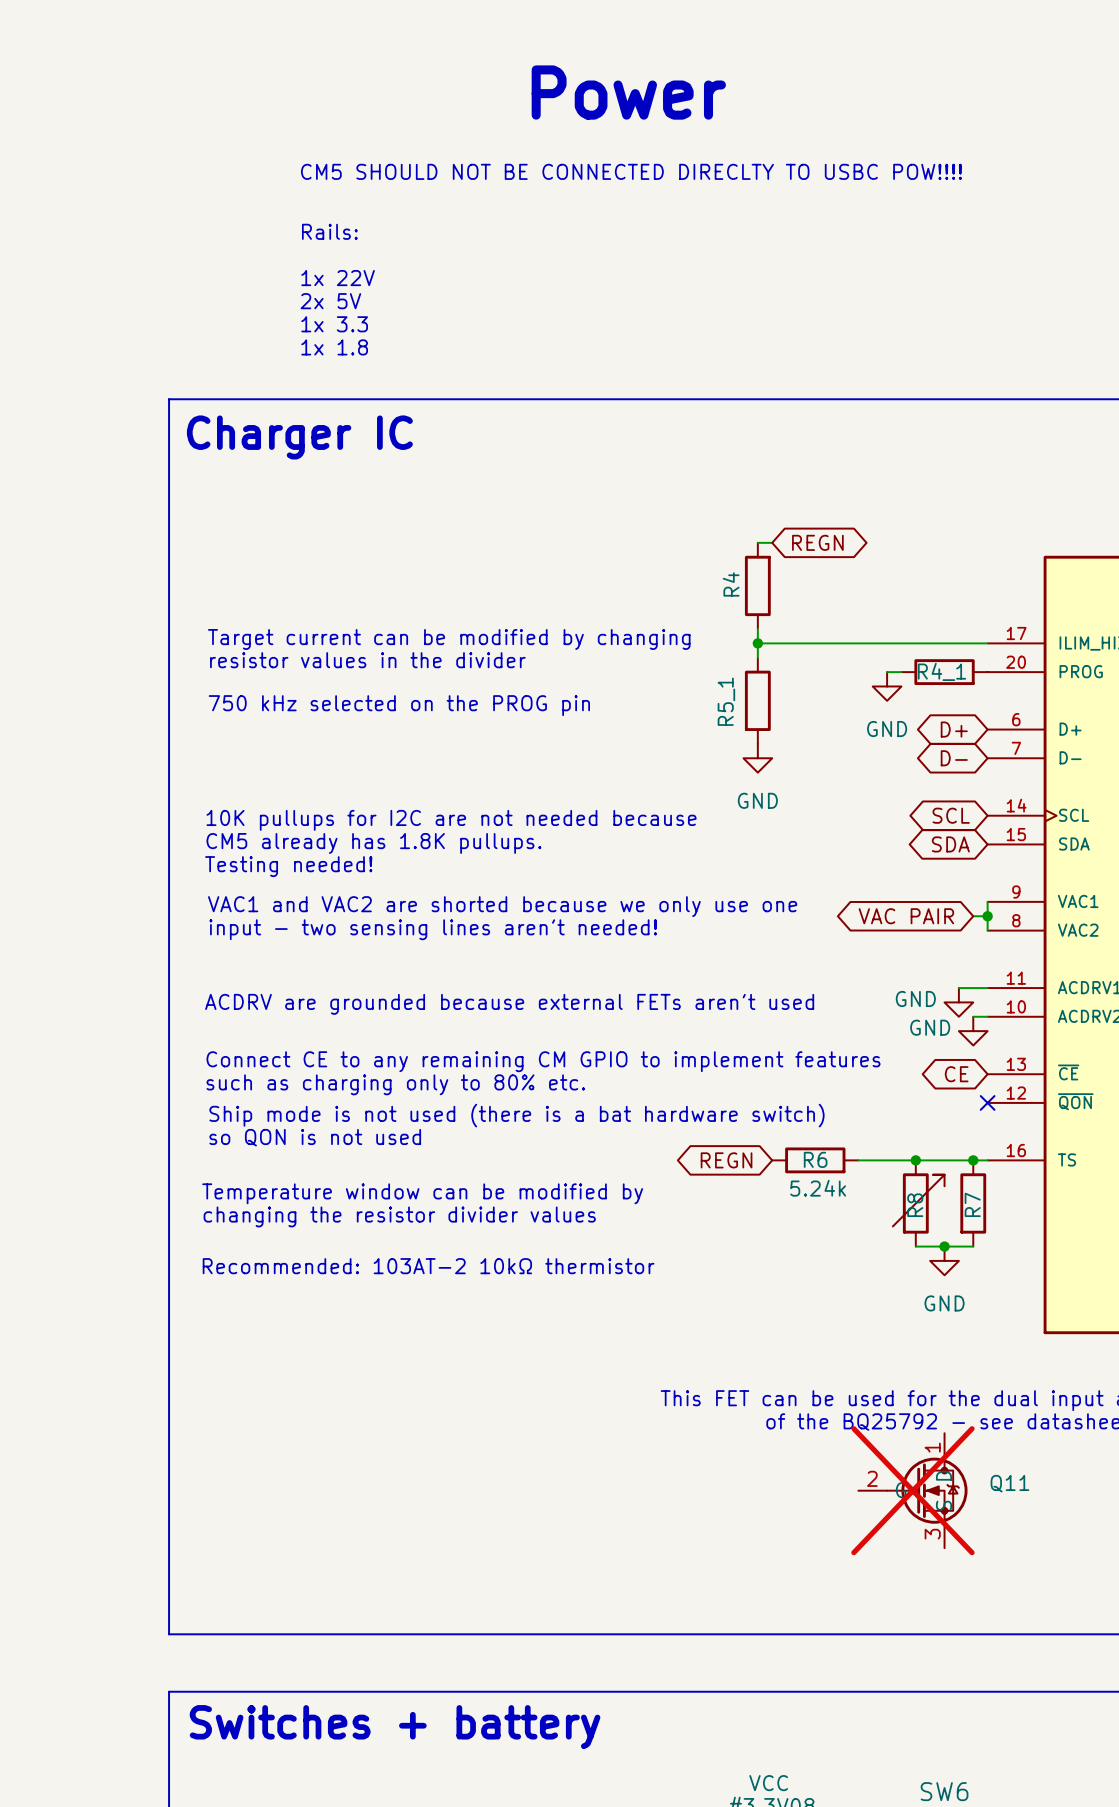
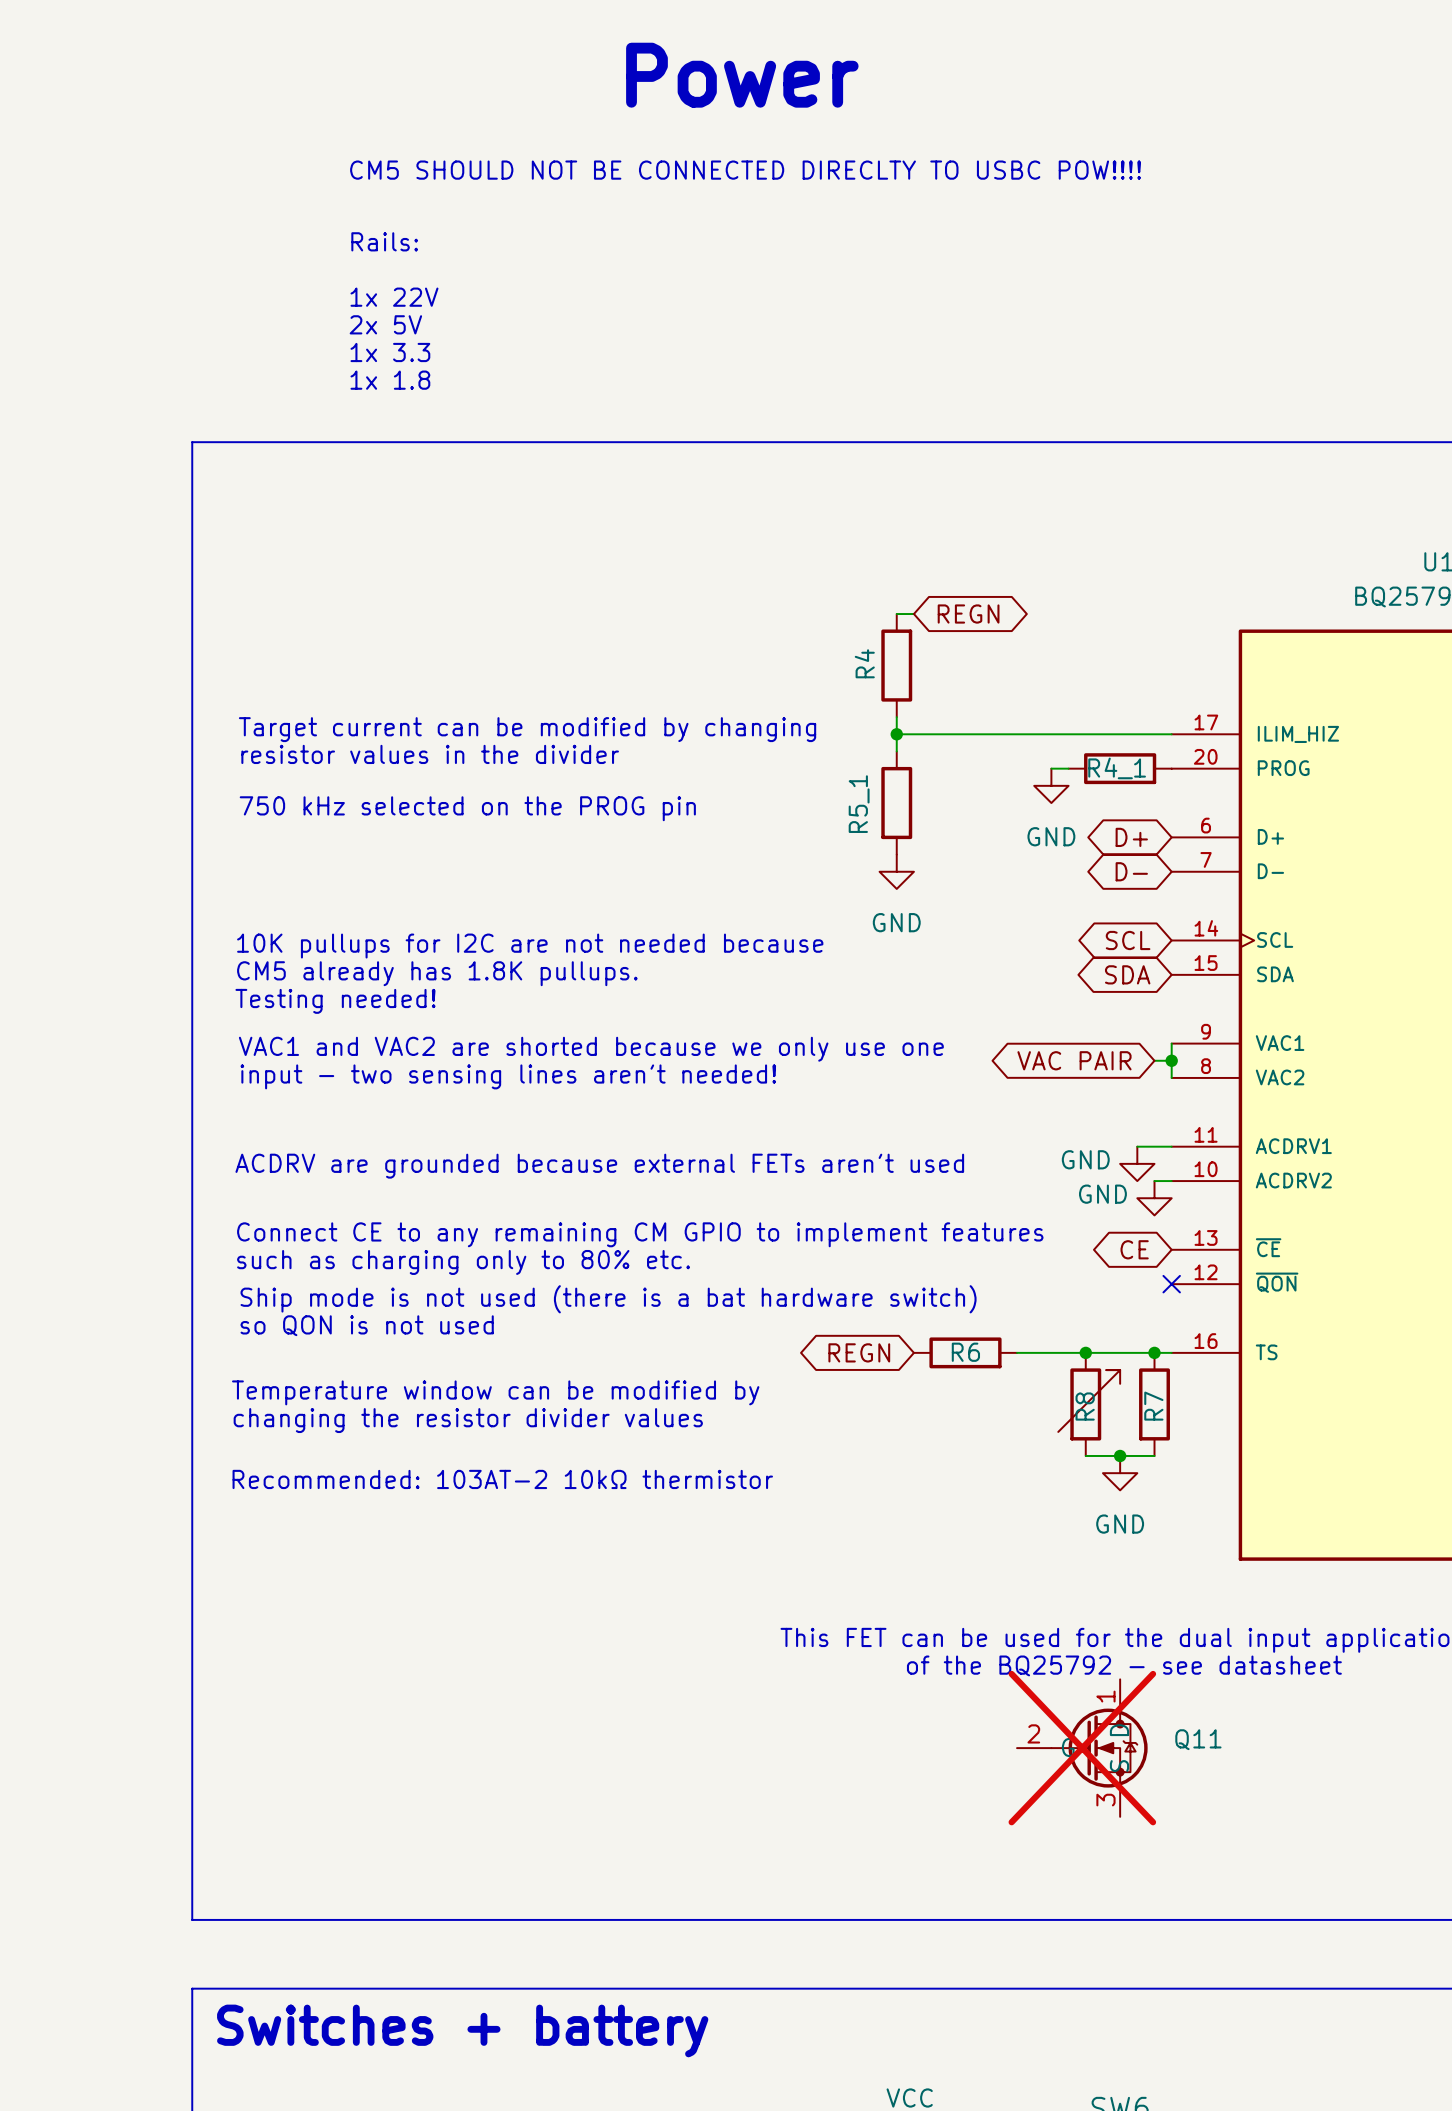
text: Charger IC (299, 437) -> none
R6 value: 5.24k (818, 1188) -> none

